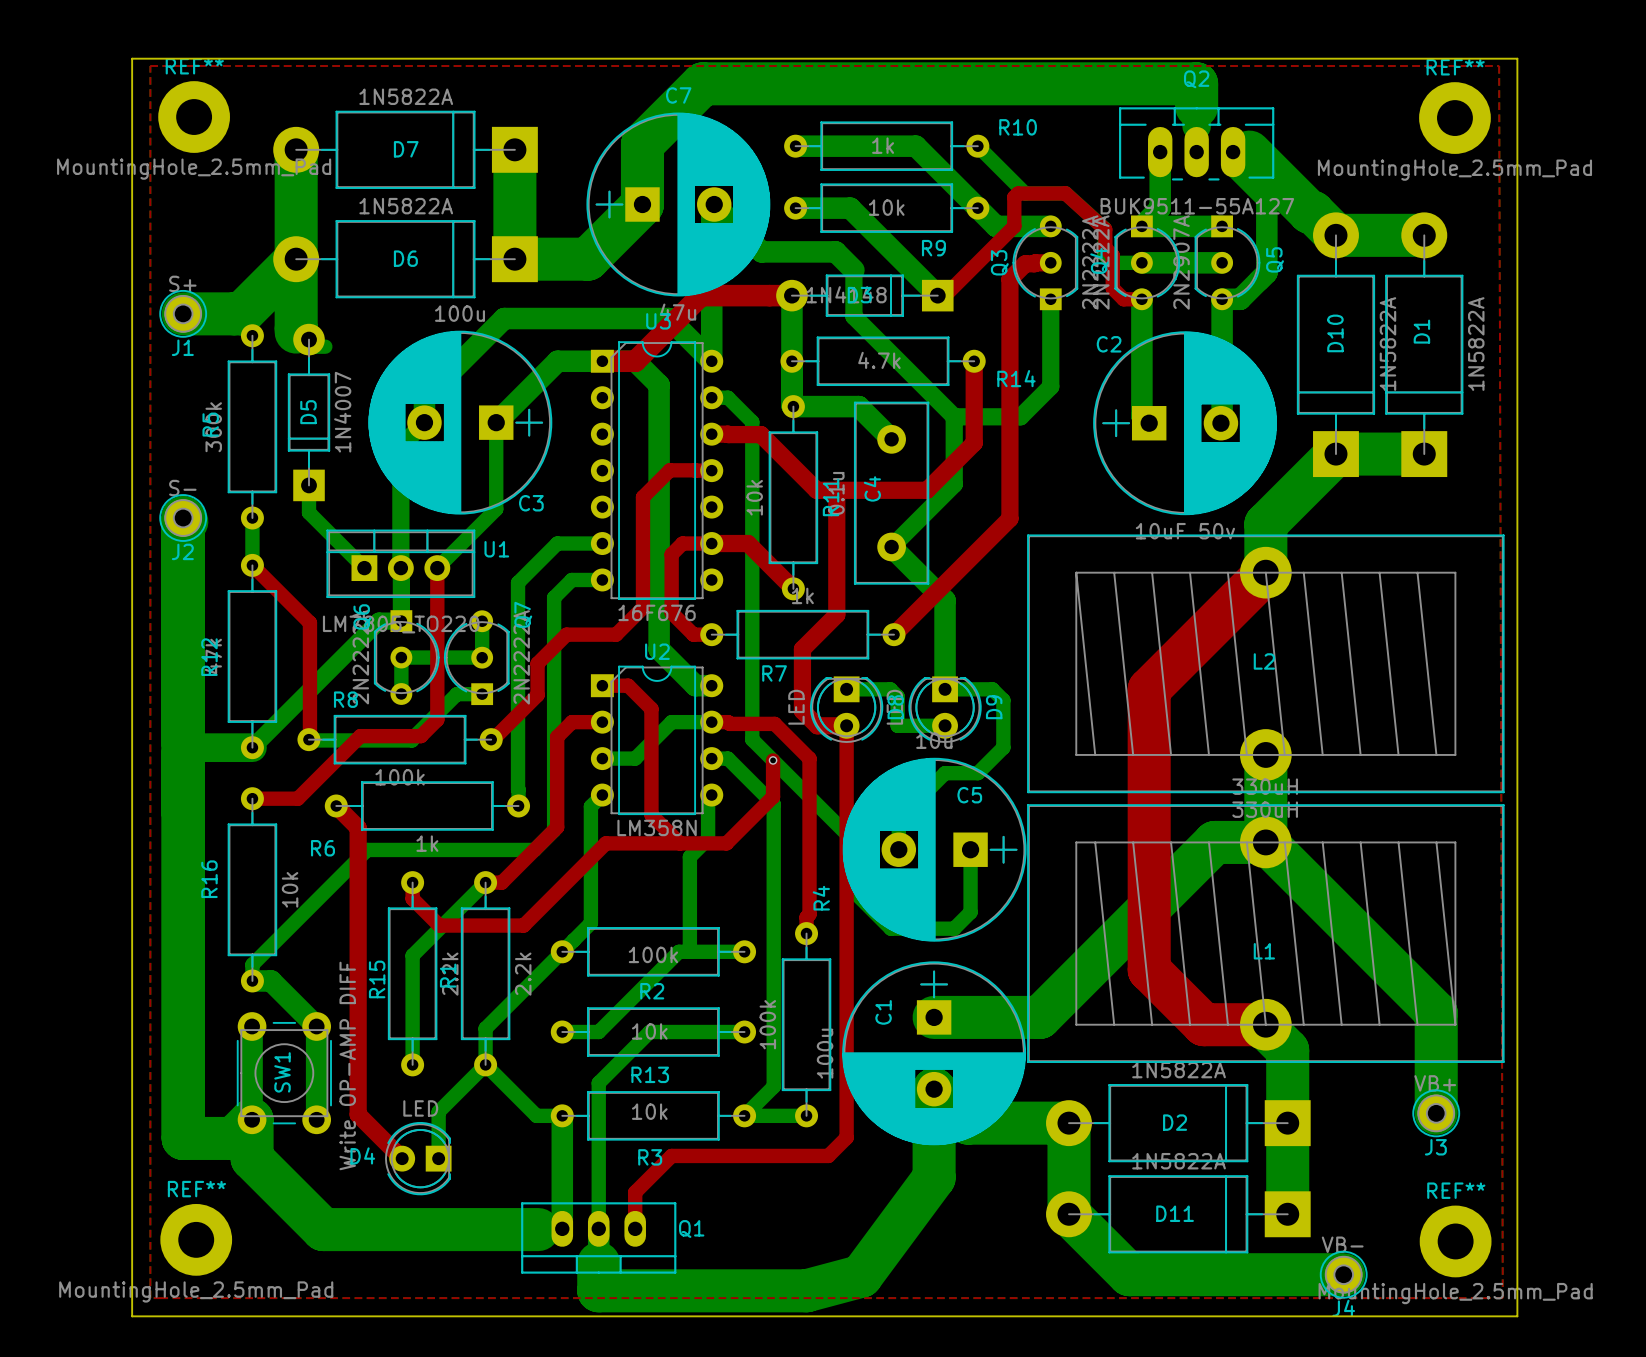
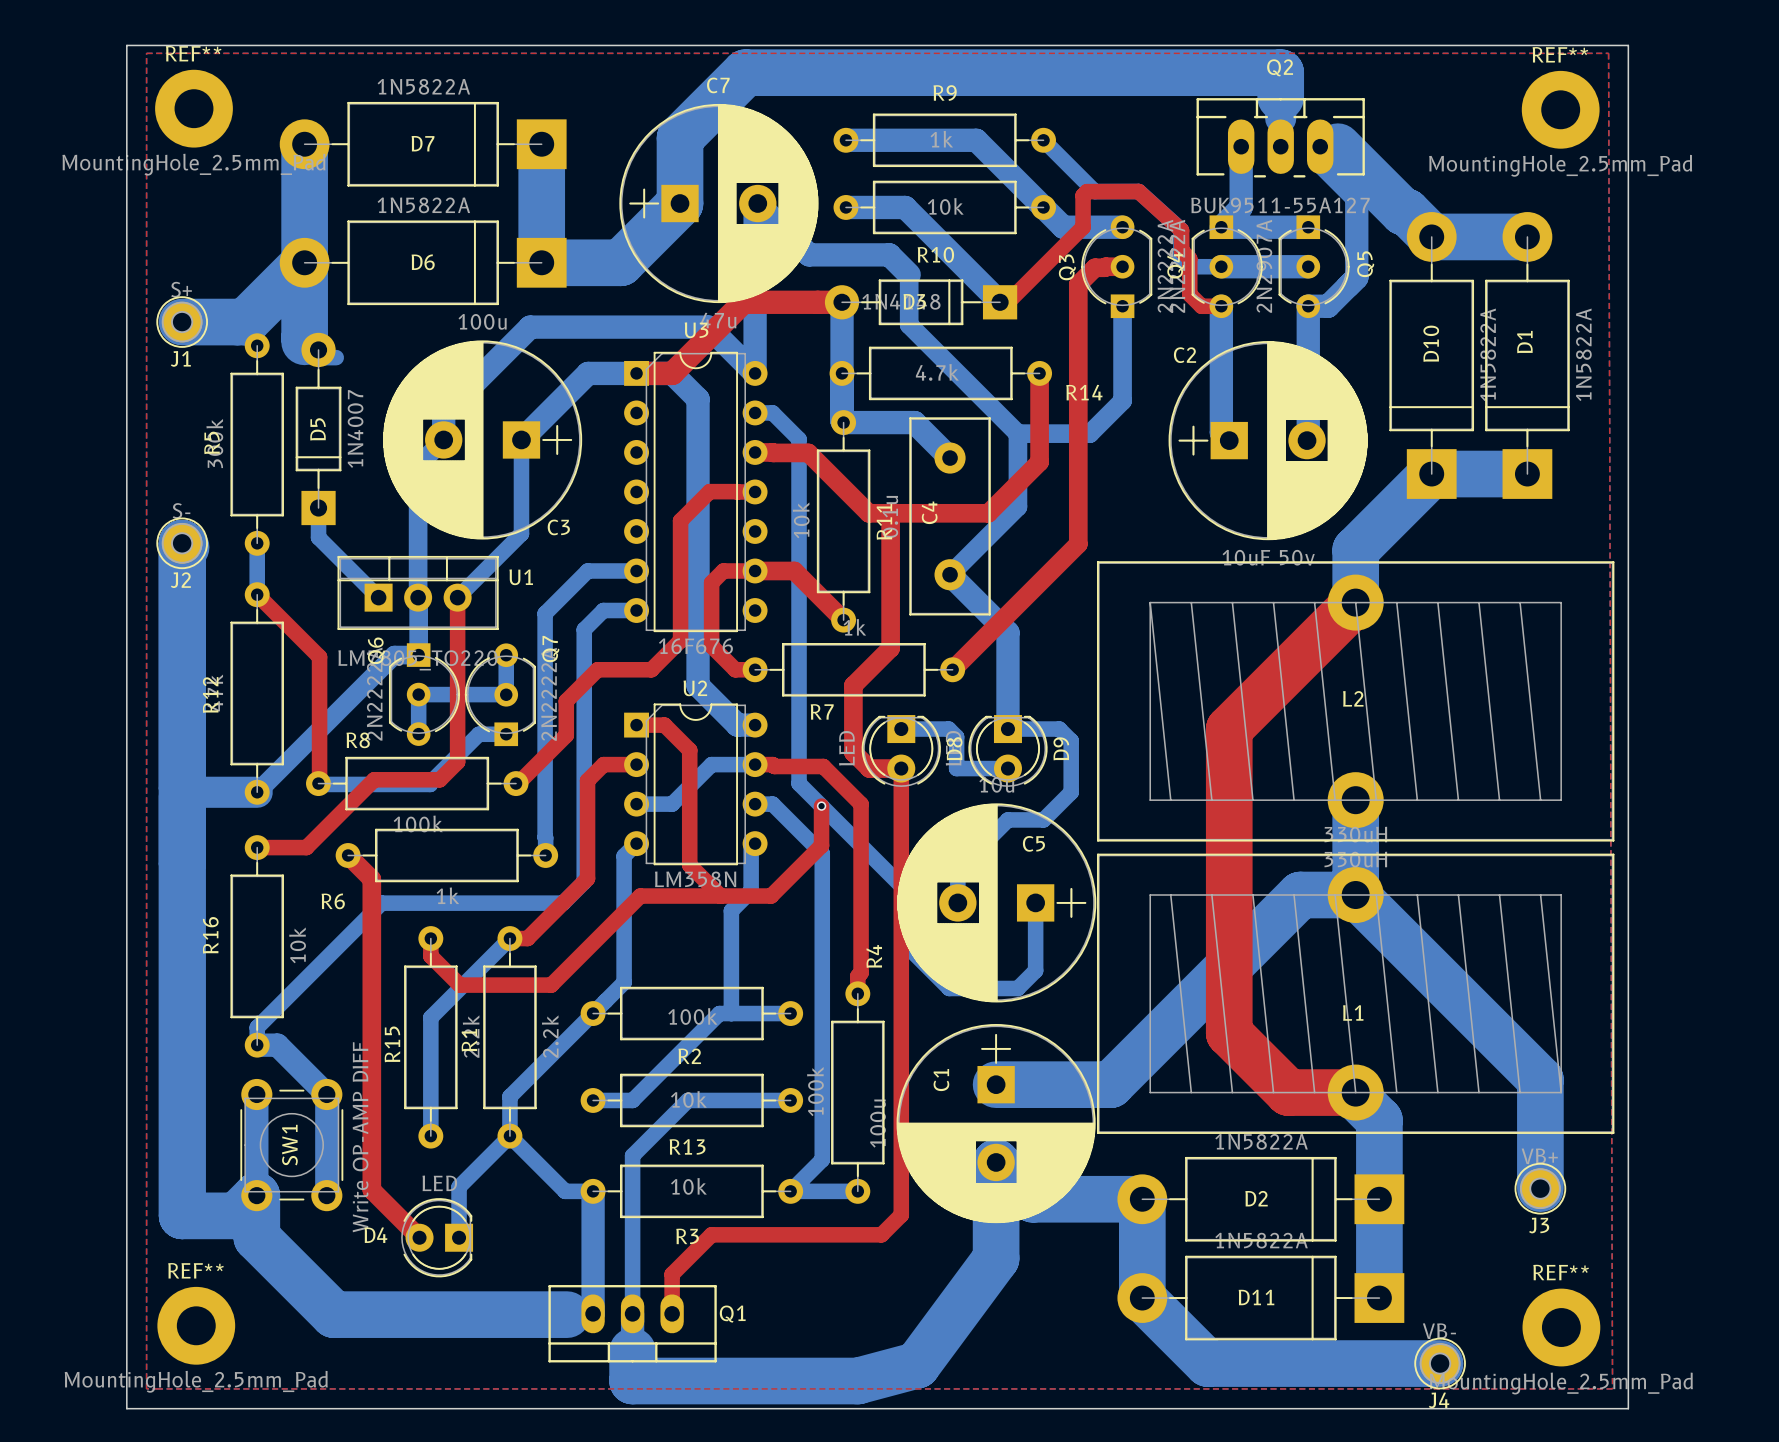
R10 name position: R10 (1018, 127) -> R10 (935, 254)
R9 name position: R9 (933, 248) -> R9 (945, 93)

